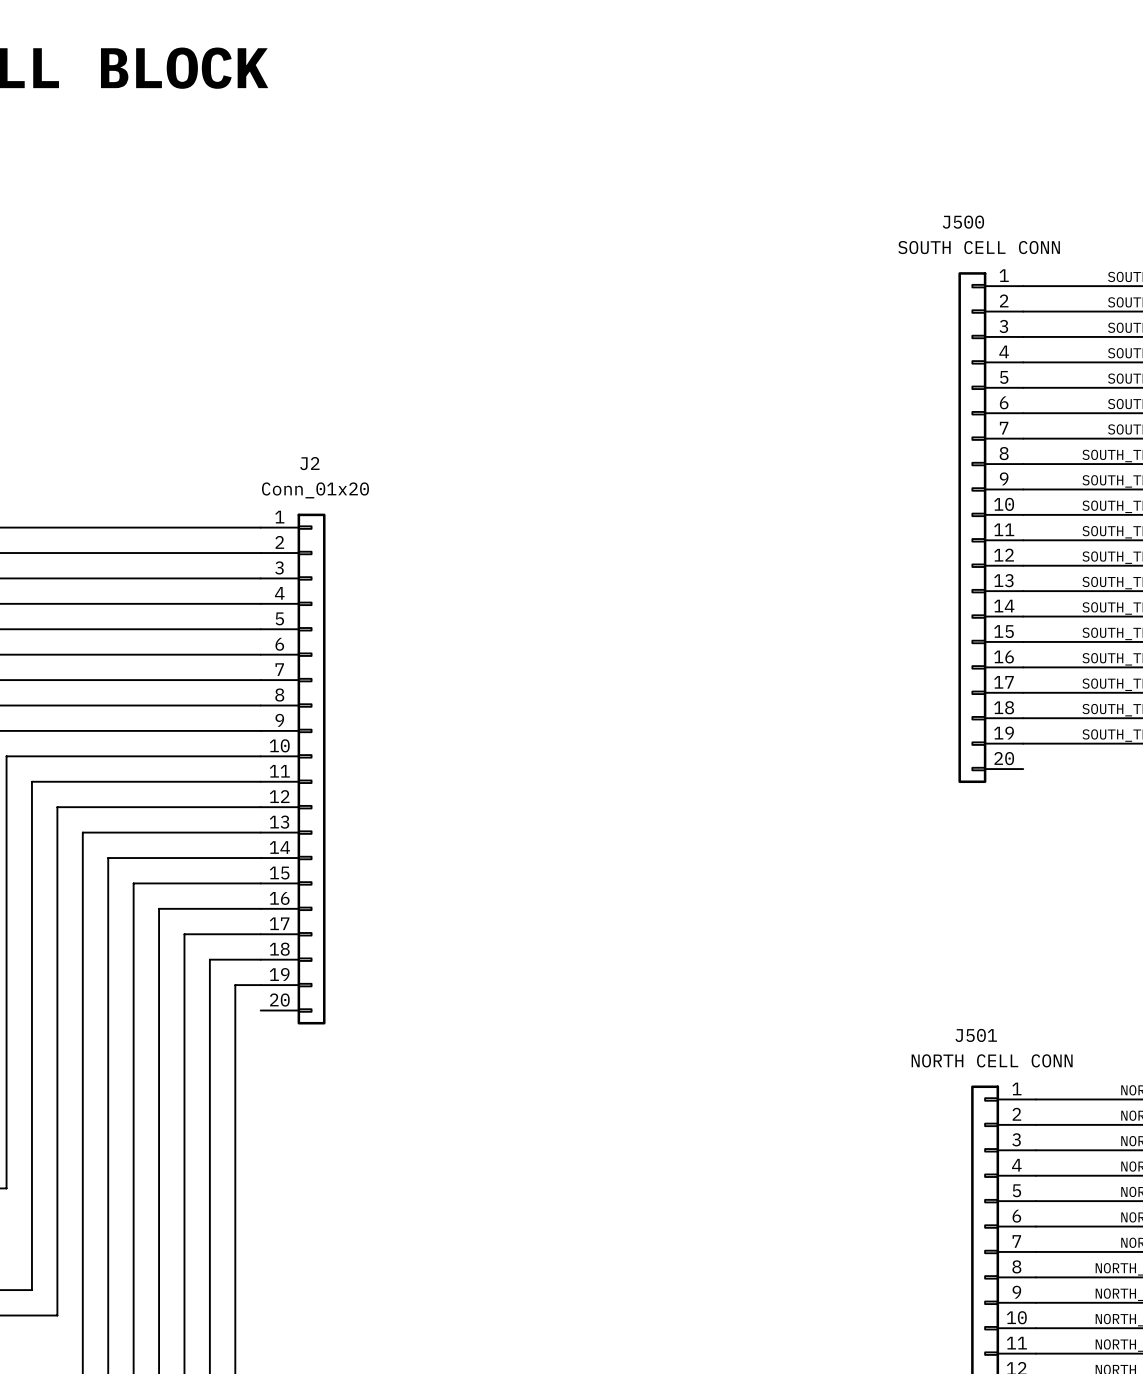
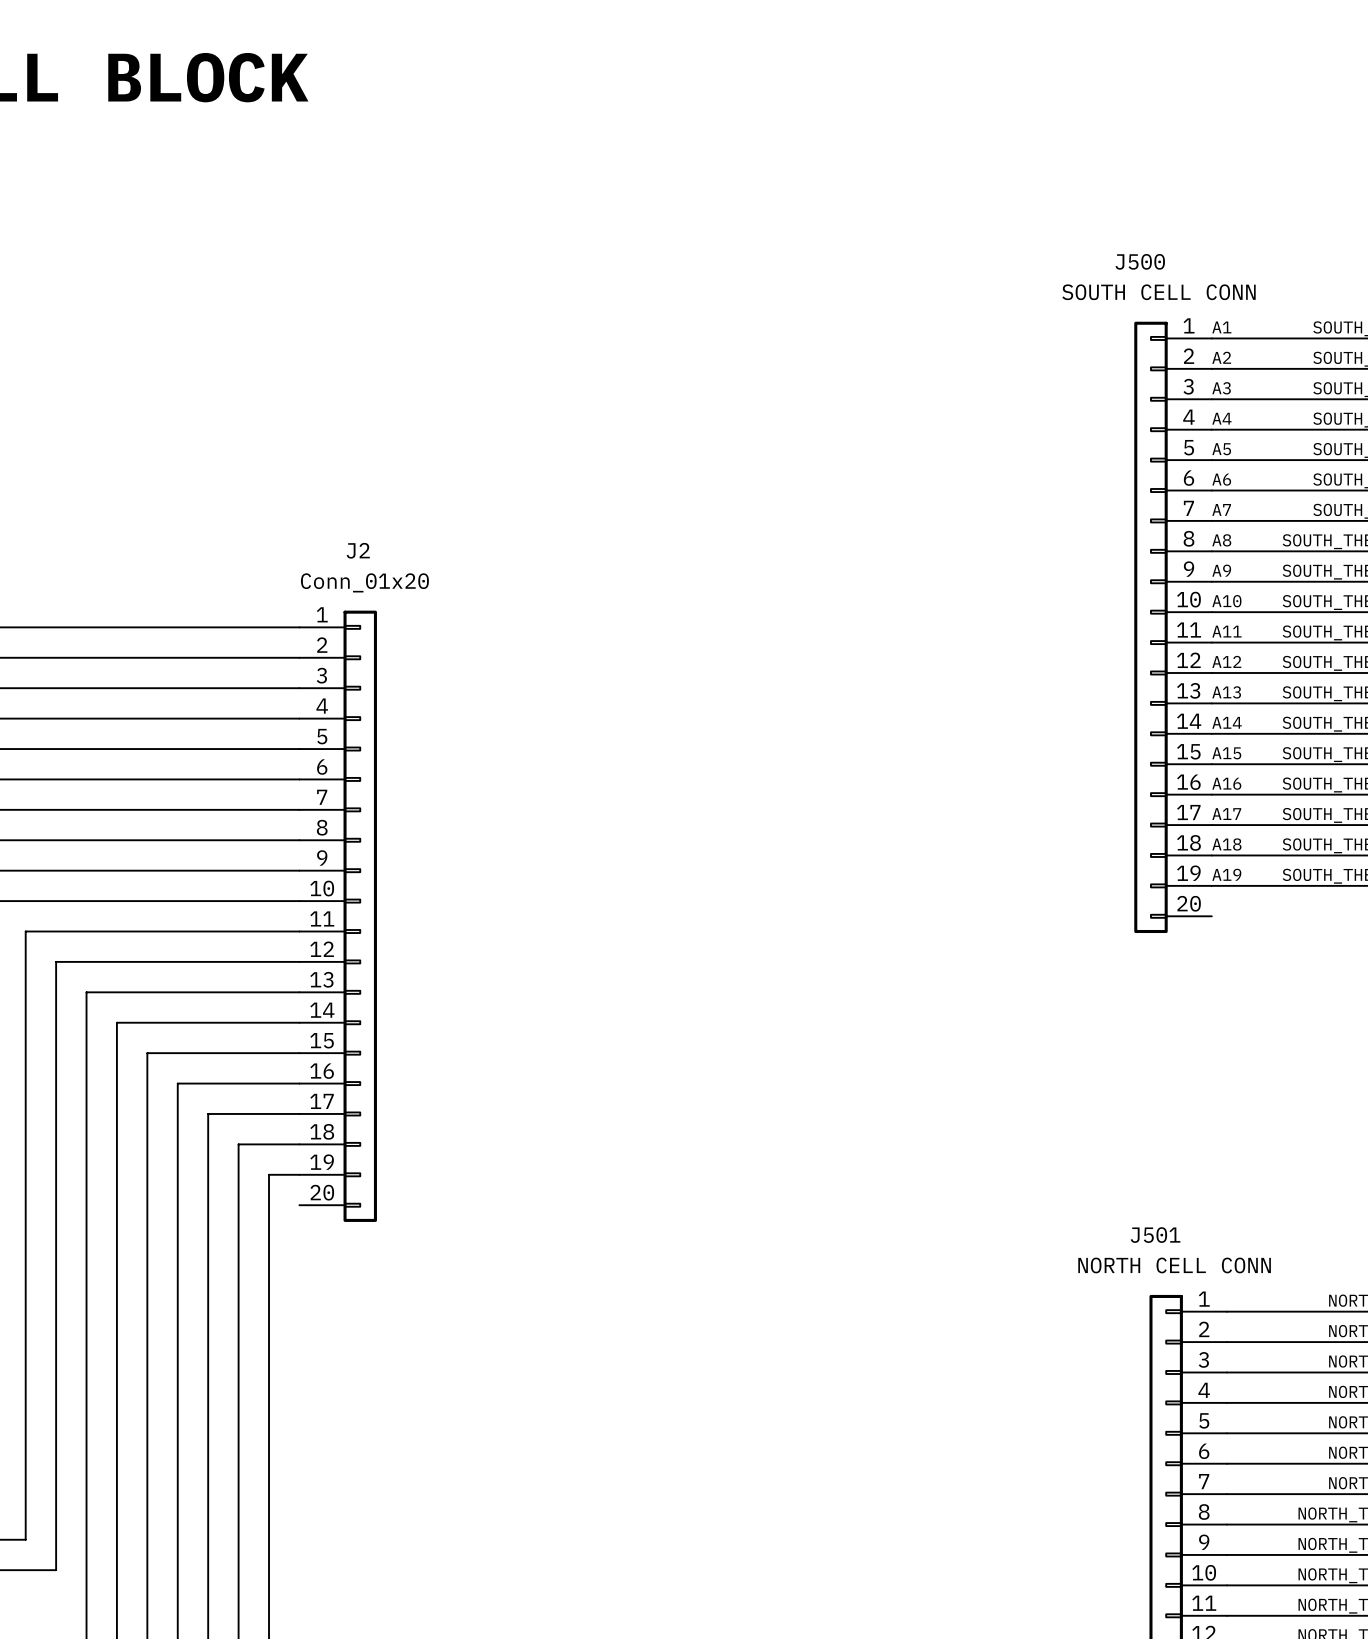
label: none -> A1 (1221, 327)
label: none -> A2 (1221, 357)
label: none -> A3 (1221, 388)
label: none -> A4 (1221, 418)
label: none -> A5 (1221, 449)
label: none -> A6 (1221, 479)
label: none -> A7 (1221, 509)
label: none -> A8 (1221, 540)
label: none -> A9 (1221, 570)
label: none -> A10 (1226, 601)
label: none -> A11 (1226, 631)
label: none -> A12 (1226, 661)
label: none -> A13 (1226, 692)
label: none -> A14 (1227, 722)
label: none -> A15 (1226, 753)
label: none -> A16 (1226, 783)
label: none -> A17 (1226, 814)
label: none -> A18 (1226, 844)
label: none -> A19 (1226, 874)

